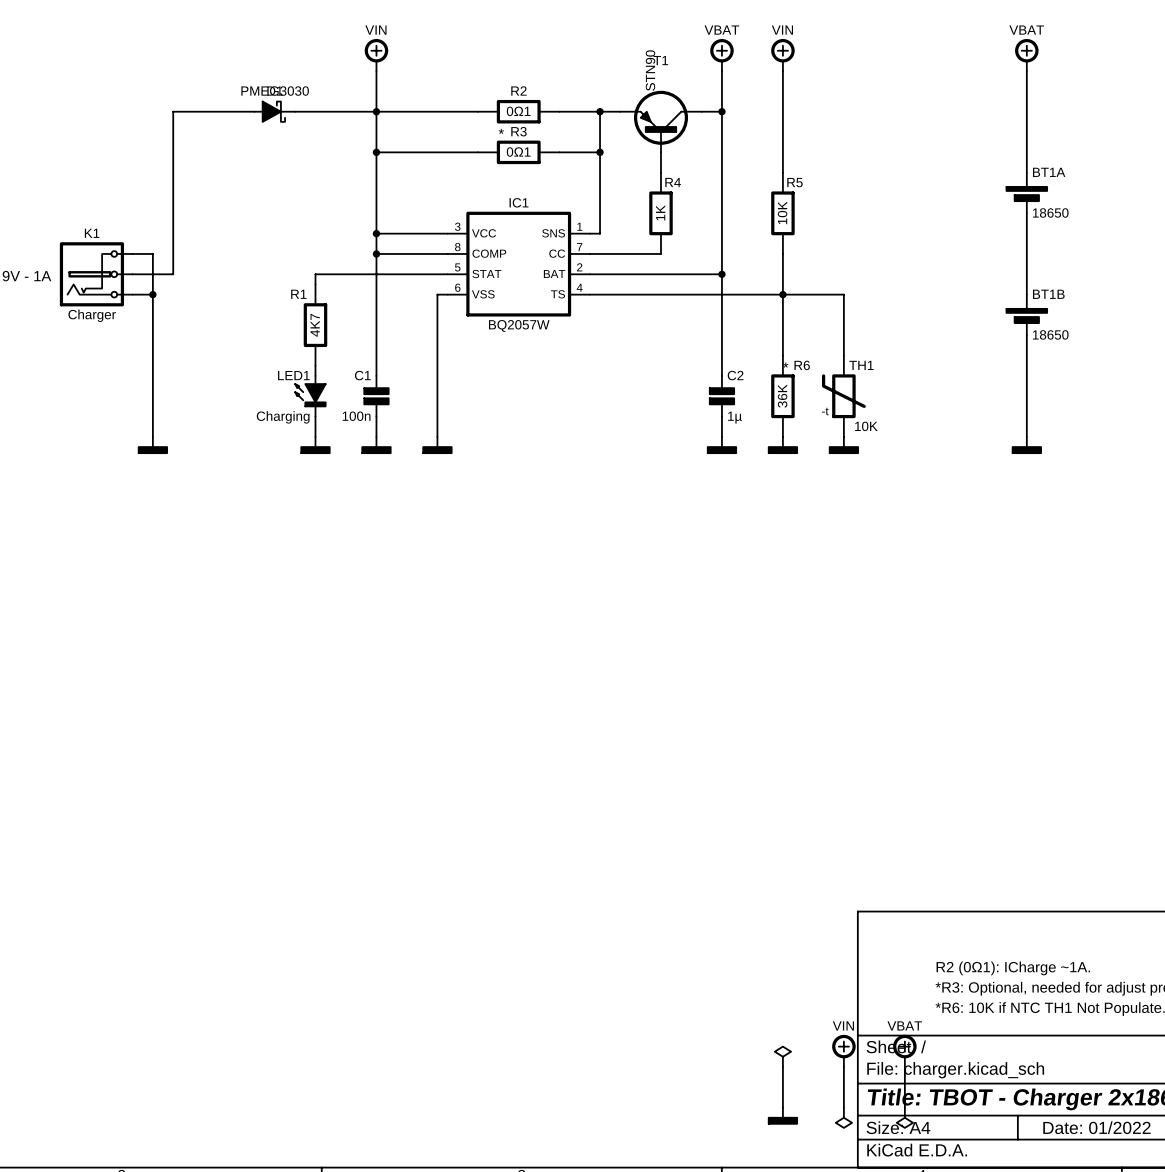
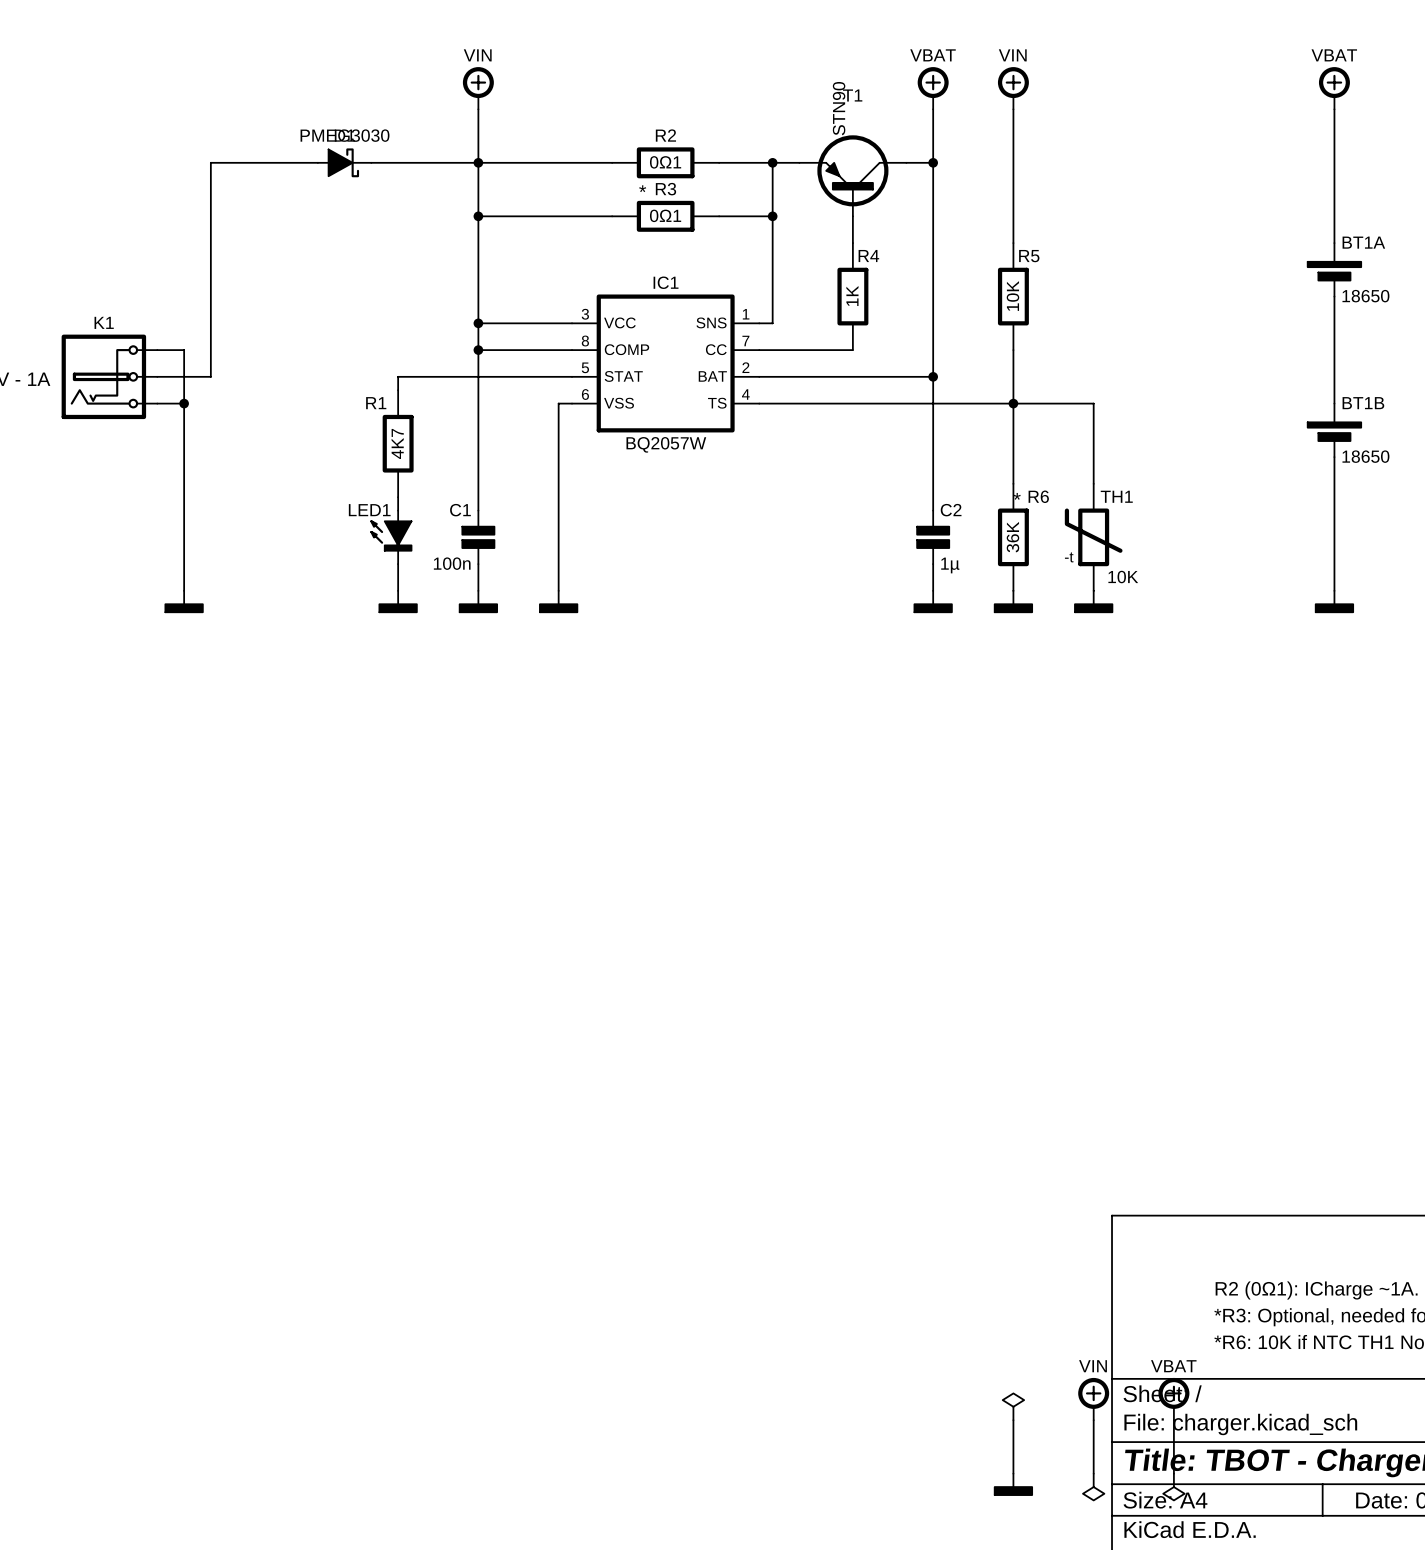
K1 value: Charger (92, 315) -> none
LED1 value: Charging (283, 417) -> none

